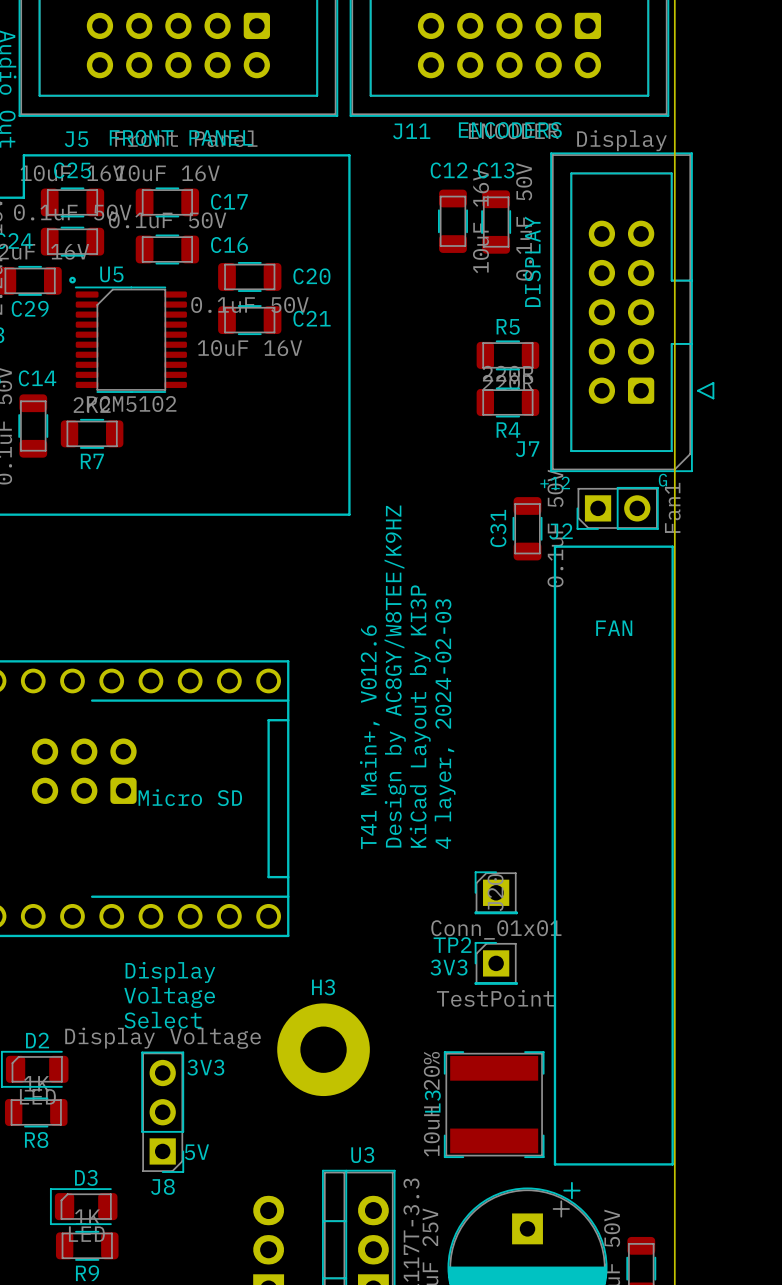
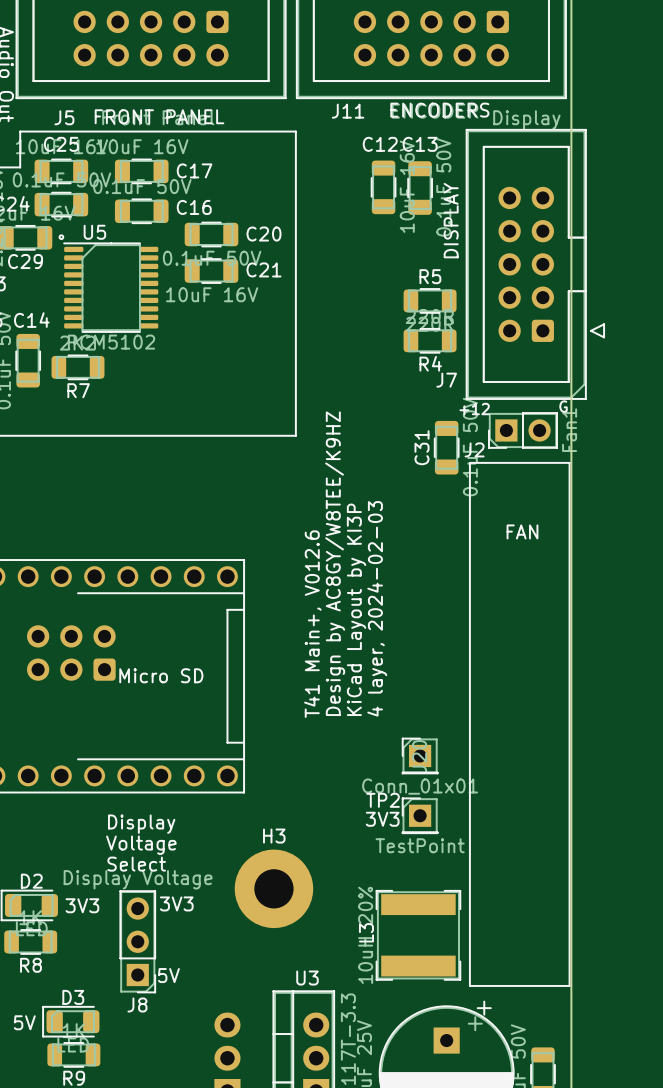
text: none -> 3V3 (82, 905)
text: none -> 5V (24, 1022)

